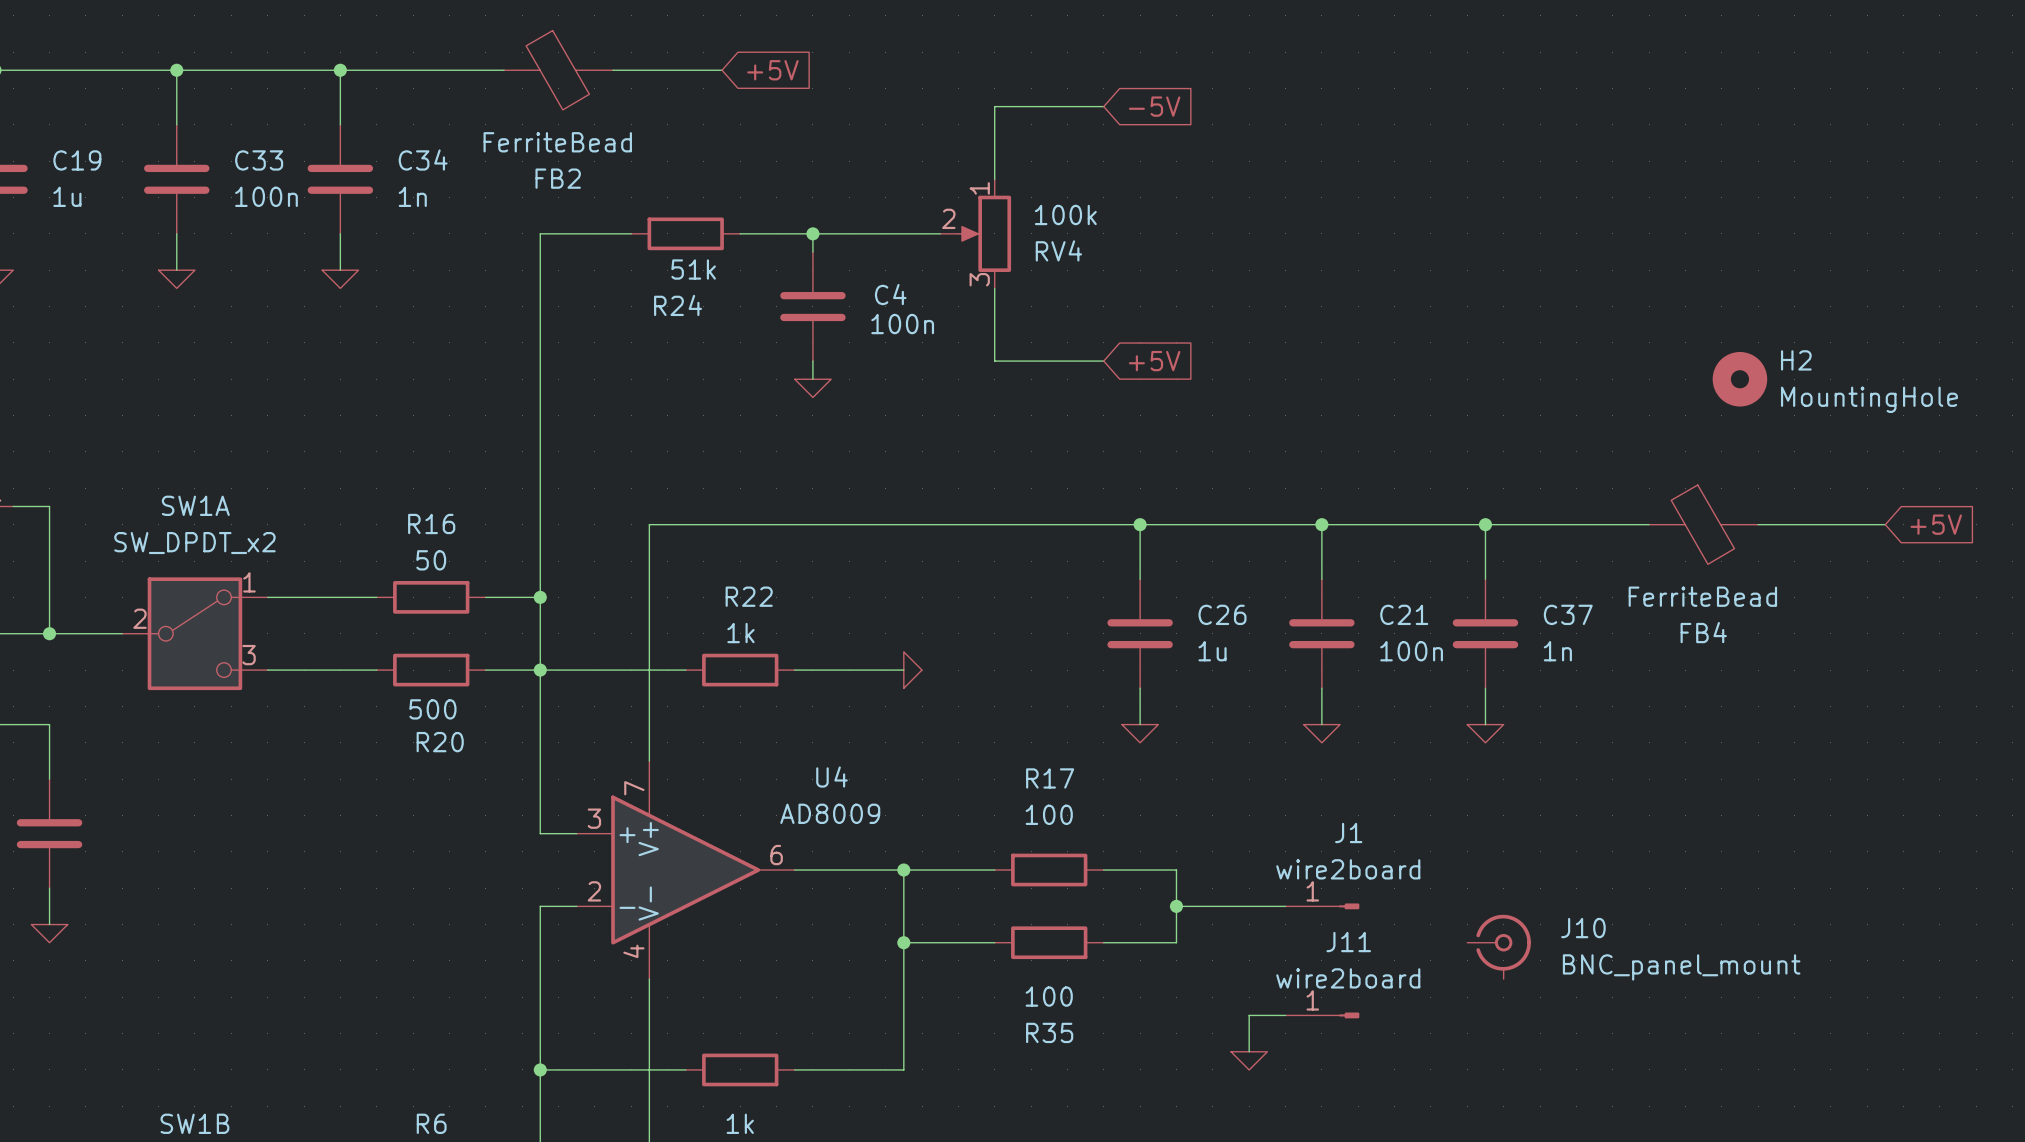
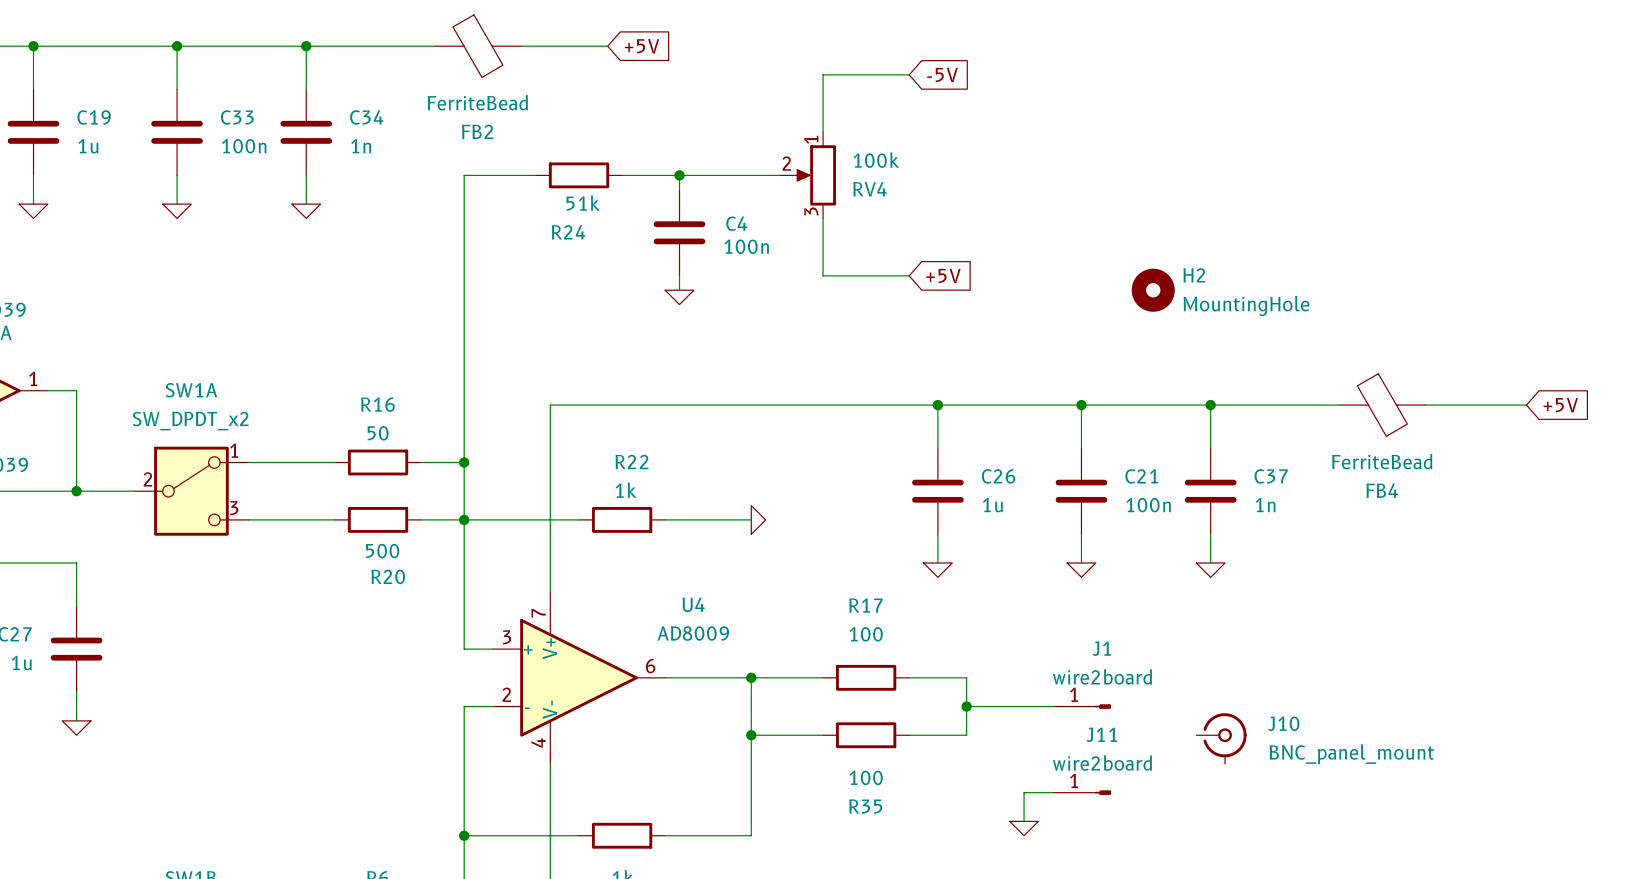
H2 position: (1739, 379) -> (1153, 290)

